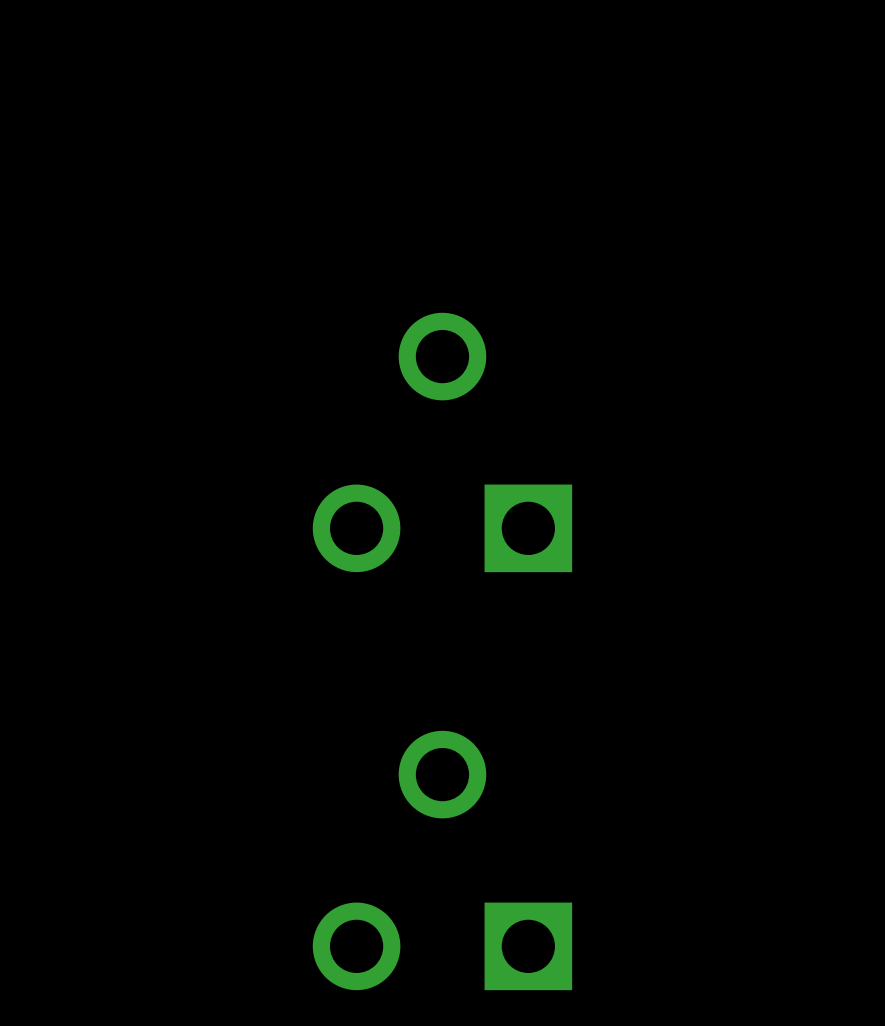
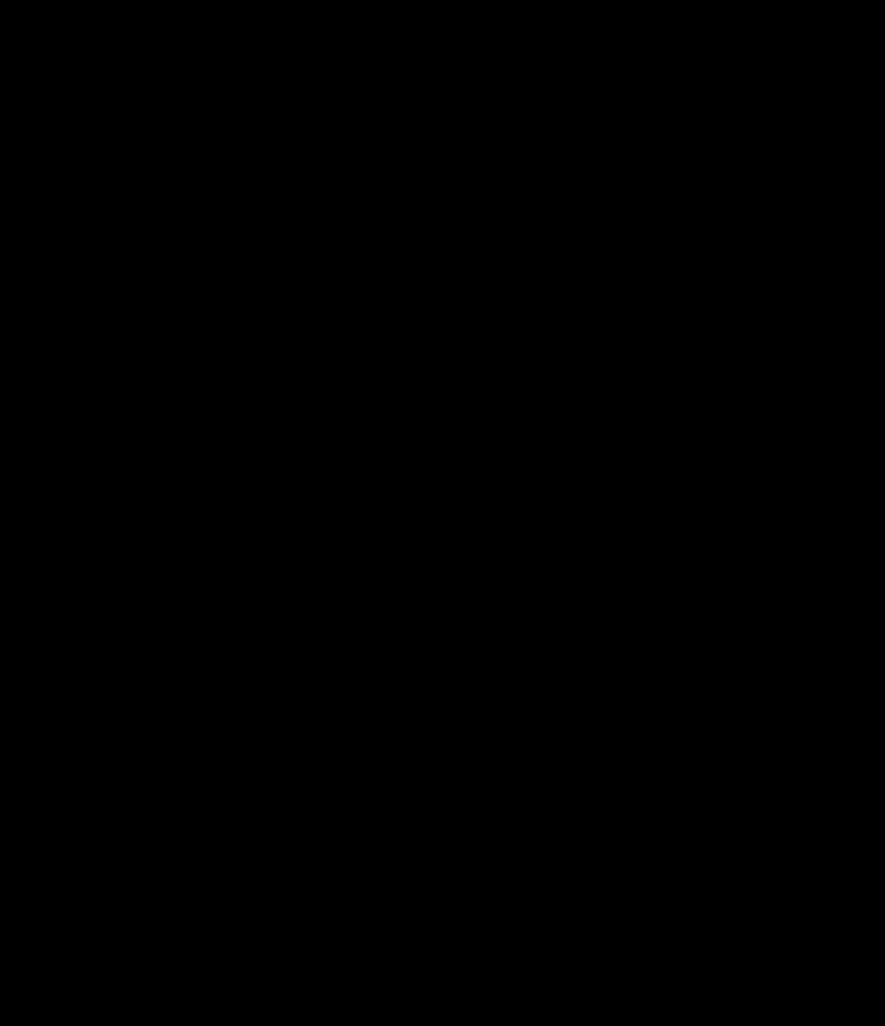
part: (442, 442) -> none
part: (442, 860) -> none

